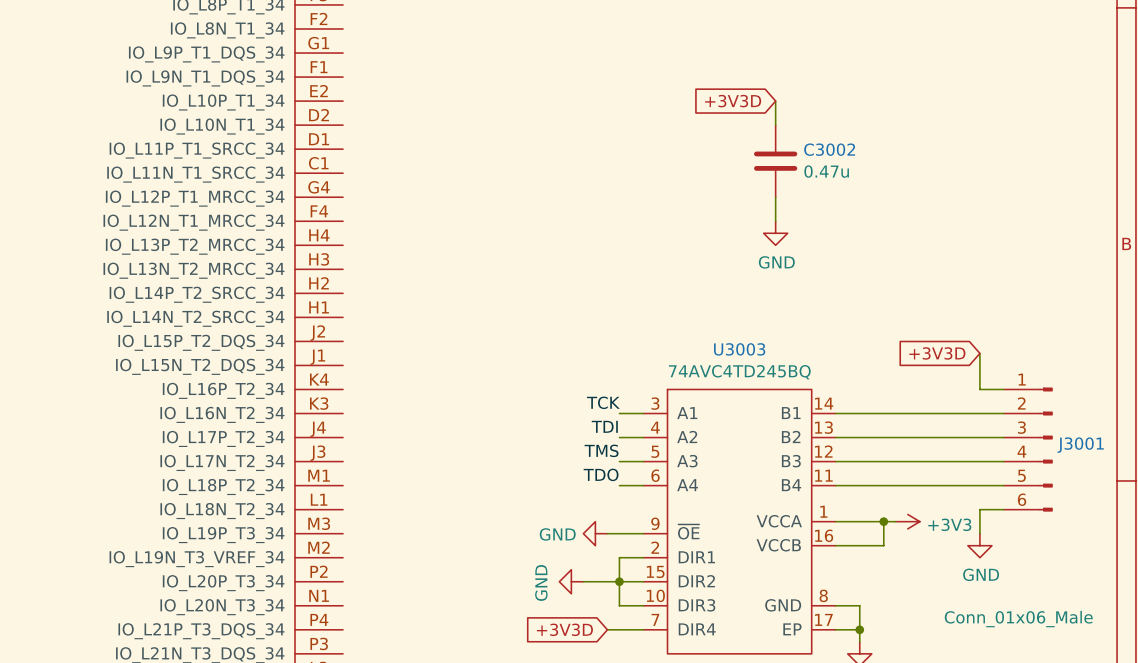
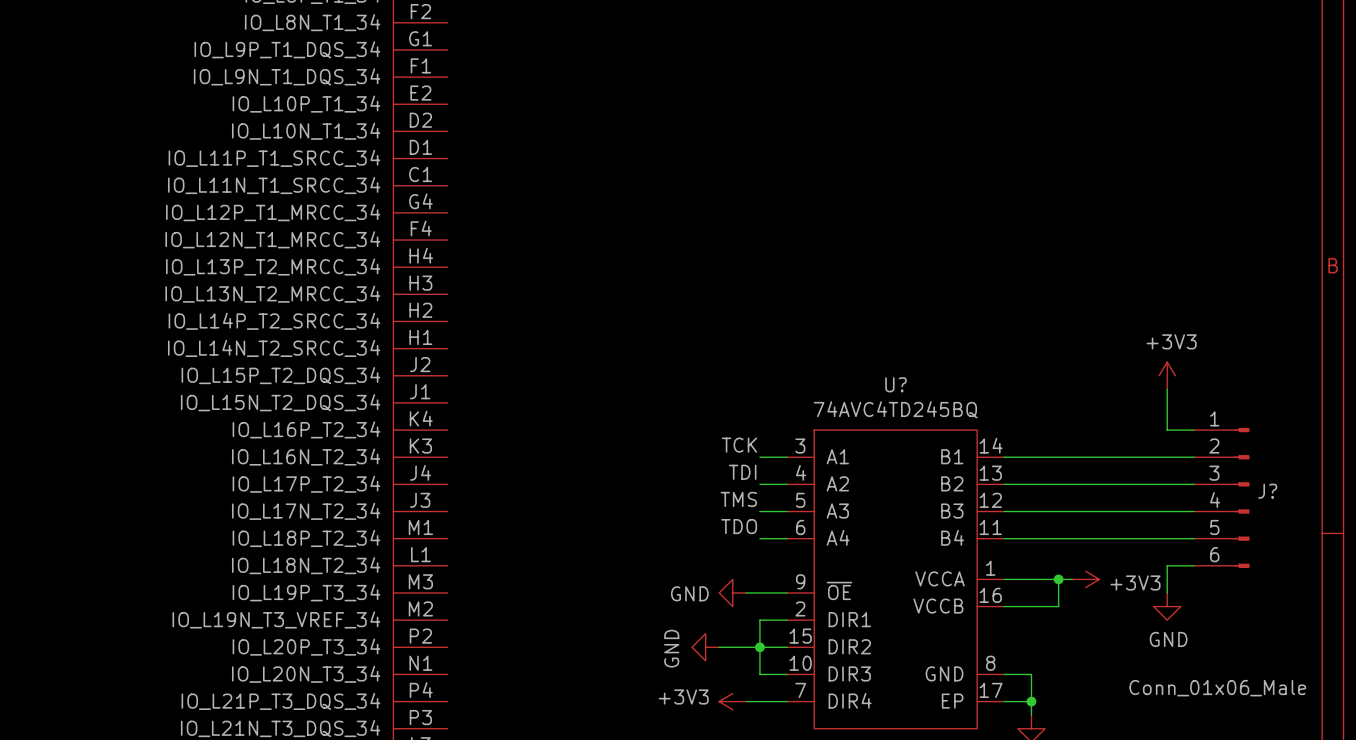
global label: +3V3D (733, 101) -> none
wire: (775, 101) (775, 125) -> none
C3002: 0.47u (775, 161) -> none
wire: (775, 197) (775, 221) -> none
power symbol: GND (775, 233) -> none
power symbol: none -> +3V3 (1167, 375)
U3003 name: U3003 (739, 349) -> U? (896, 384)
global label: +3V3D (937, 353) -> none
J3001 name: J3001 (1080, 445) -> J? (1267, 491)
global label: +3V3D (564, 629) -> none
power symbol: none -> +3V3 (732, 701)

